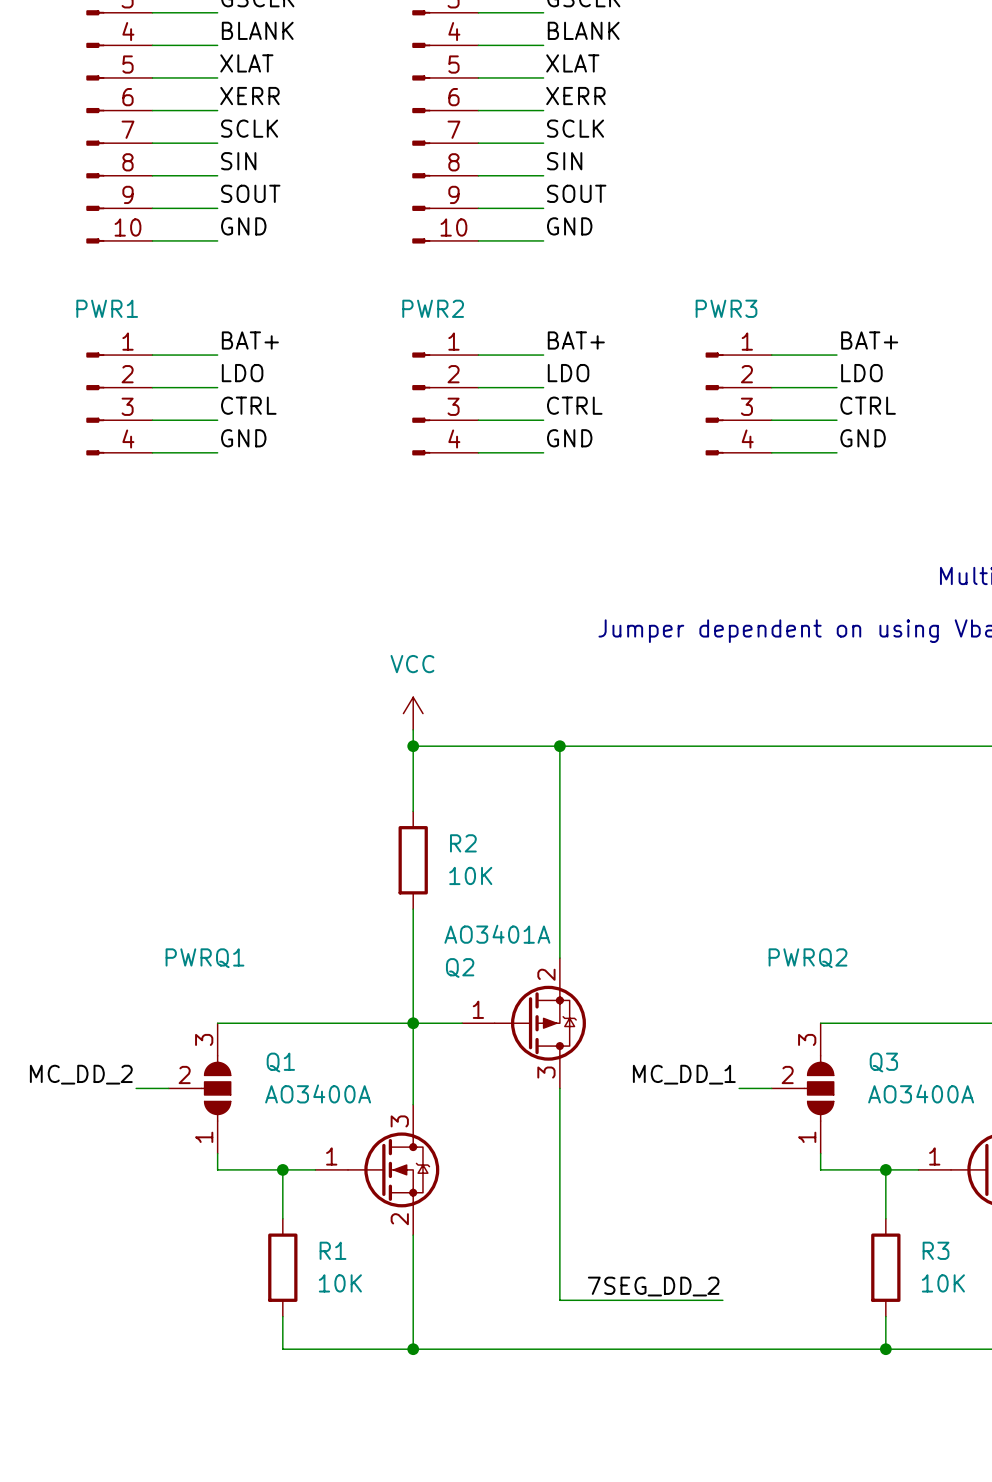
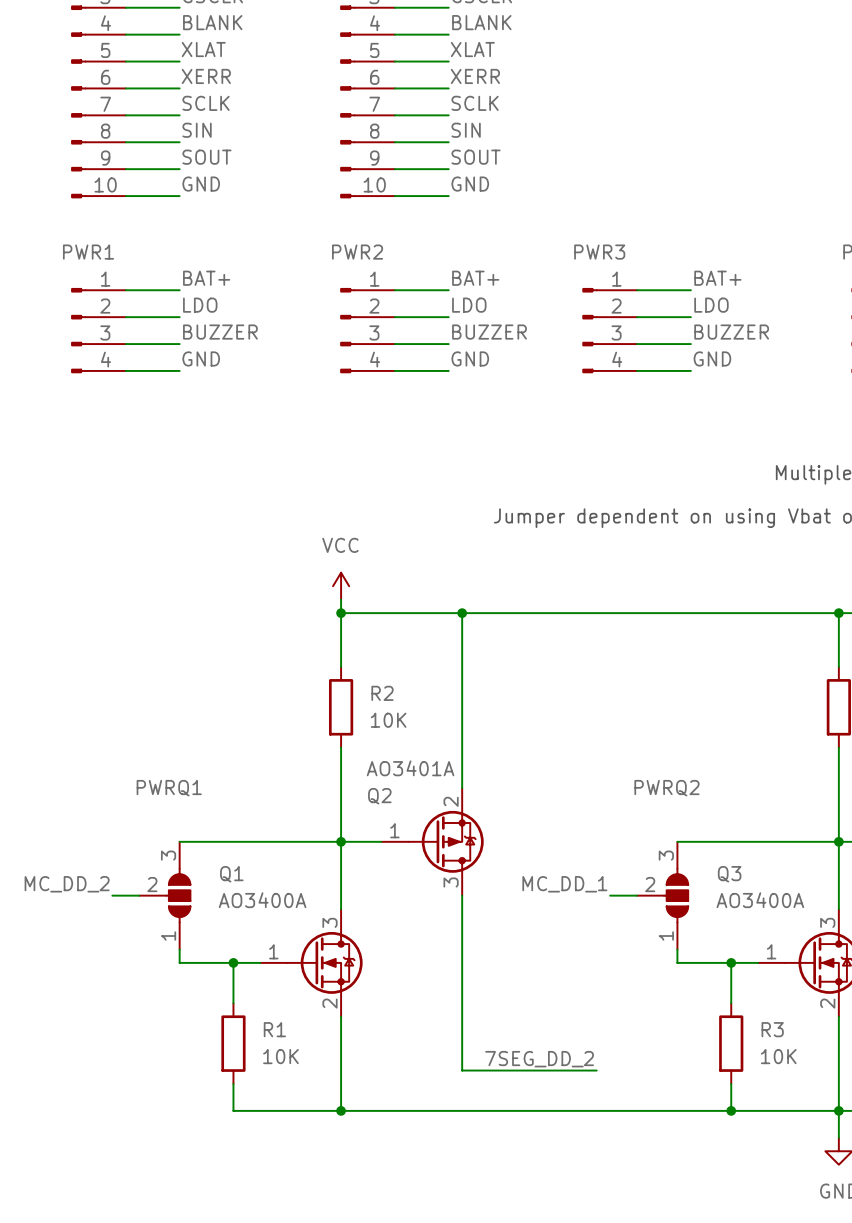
label: CTRL (248, 405) -> BUZZER (220, 332)
label: CTRL (574, 405) -> BUZZER (489, 332)
label: CTRL (868, 405) -> BUZZER (731, 332)

